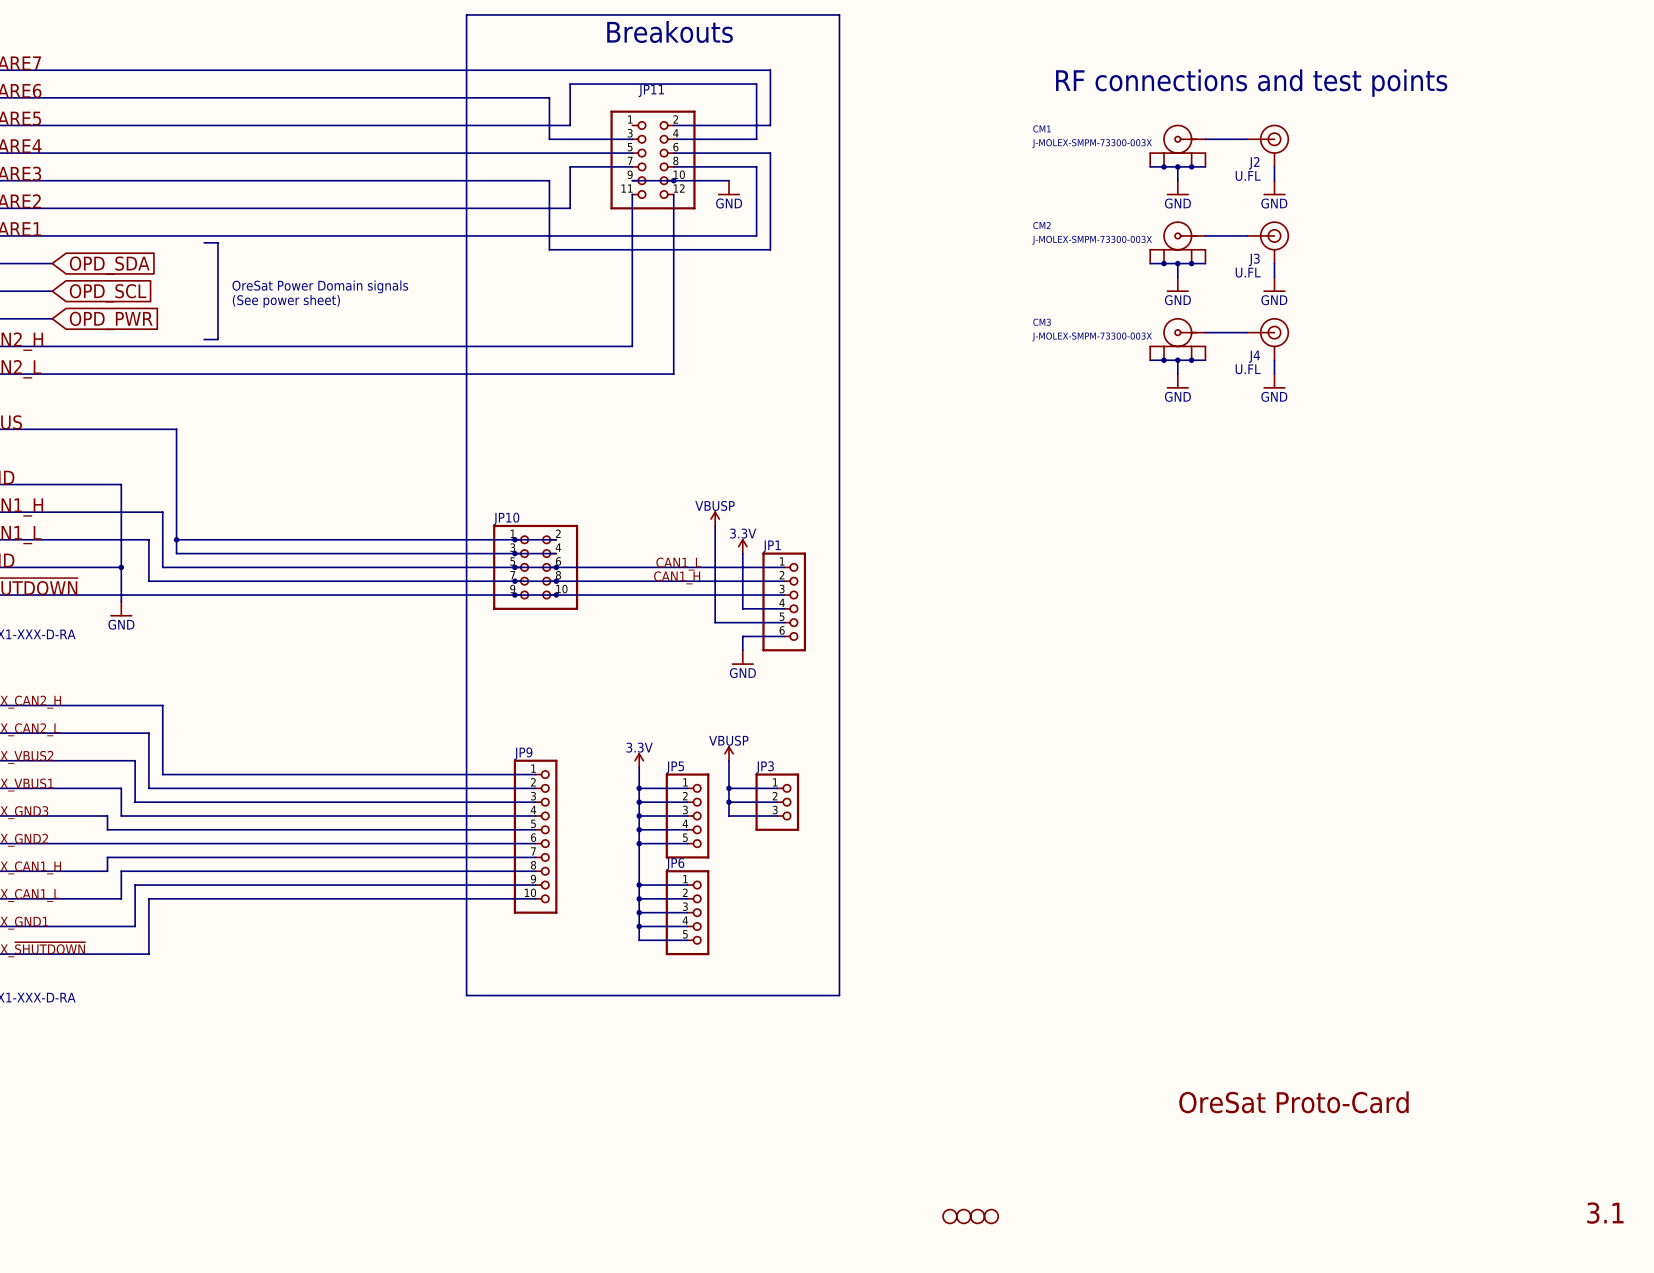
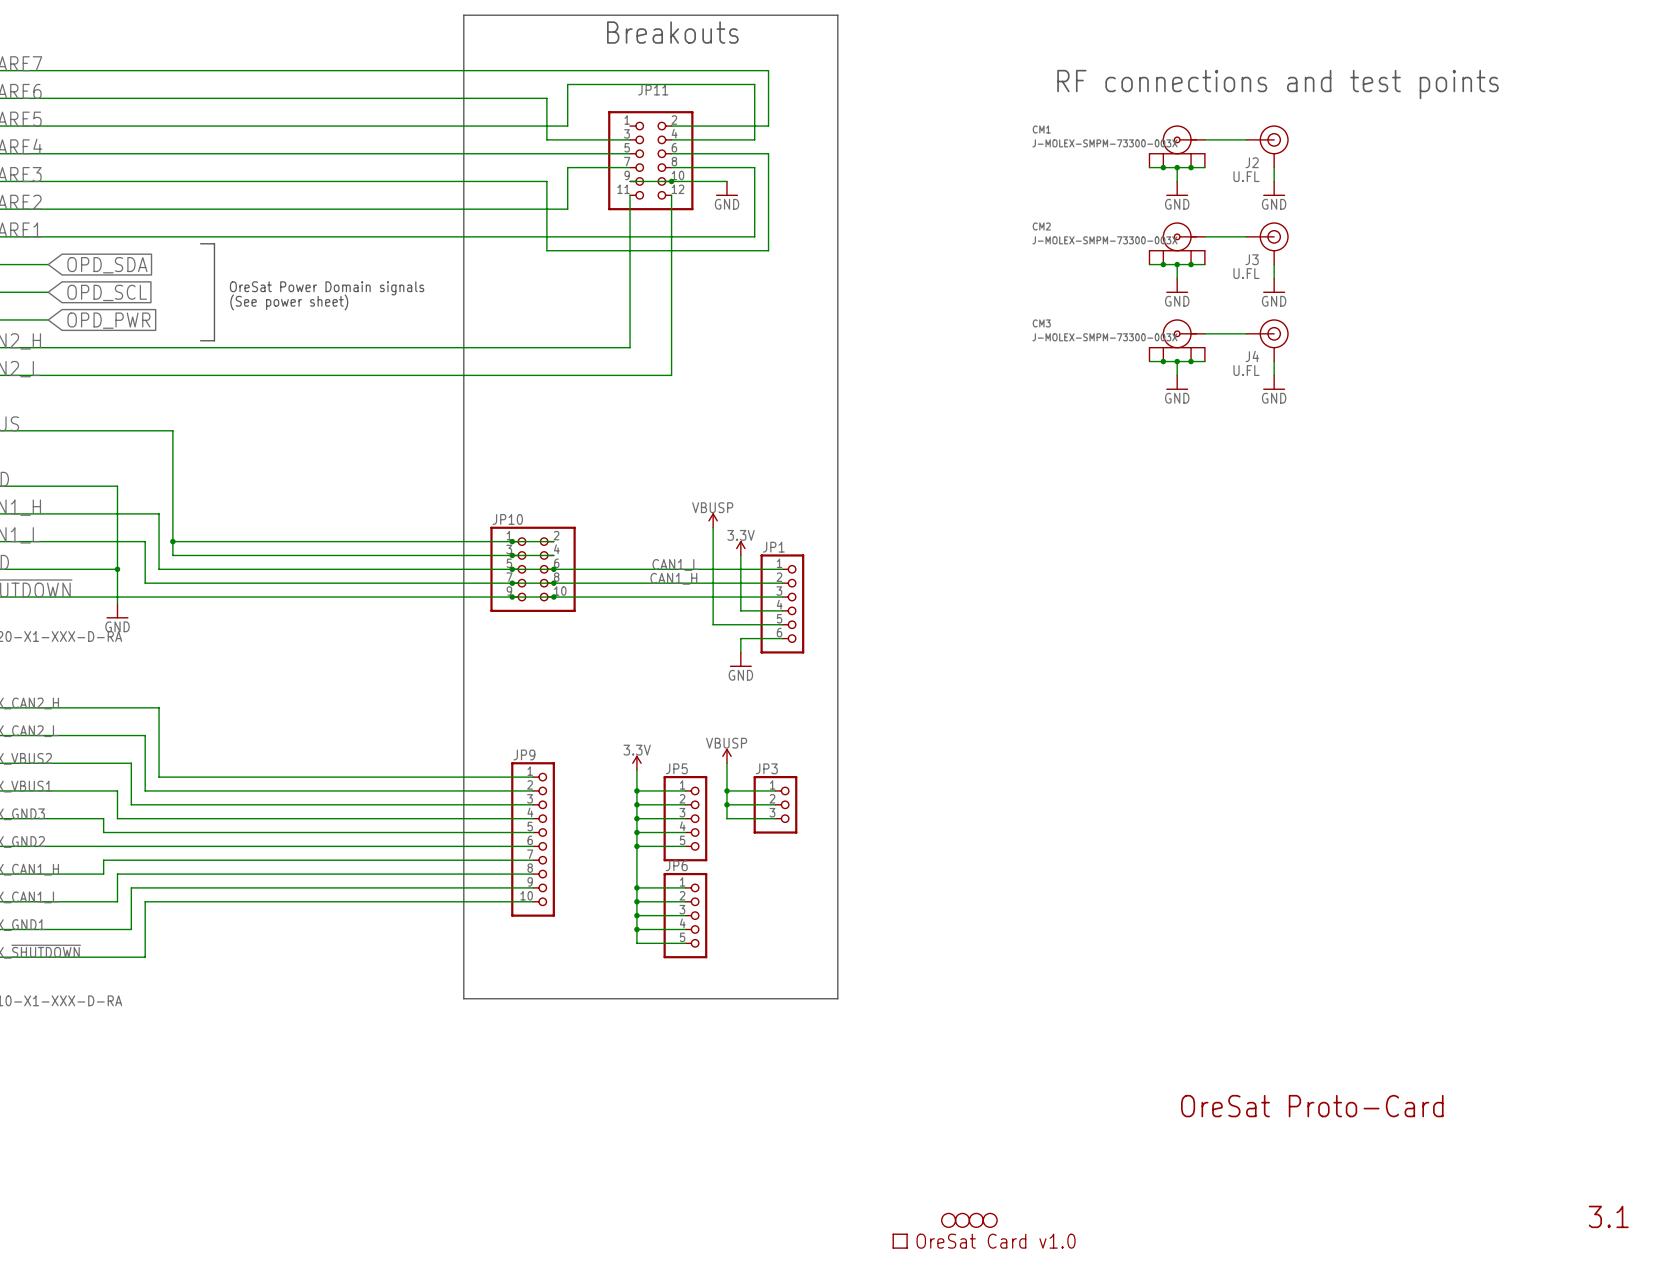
part: none -> (900, 1241)

